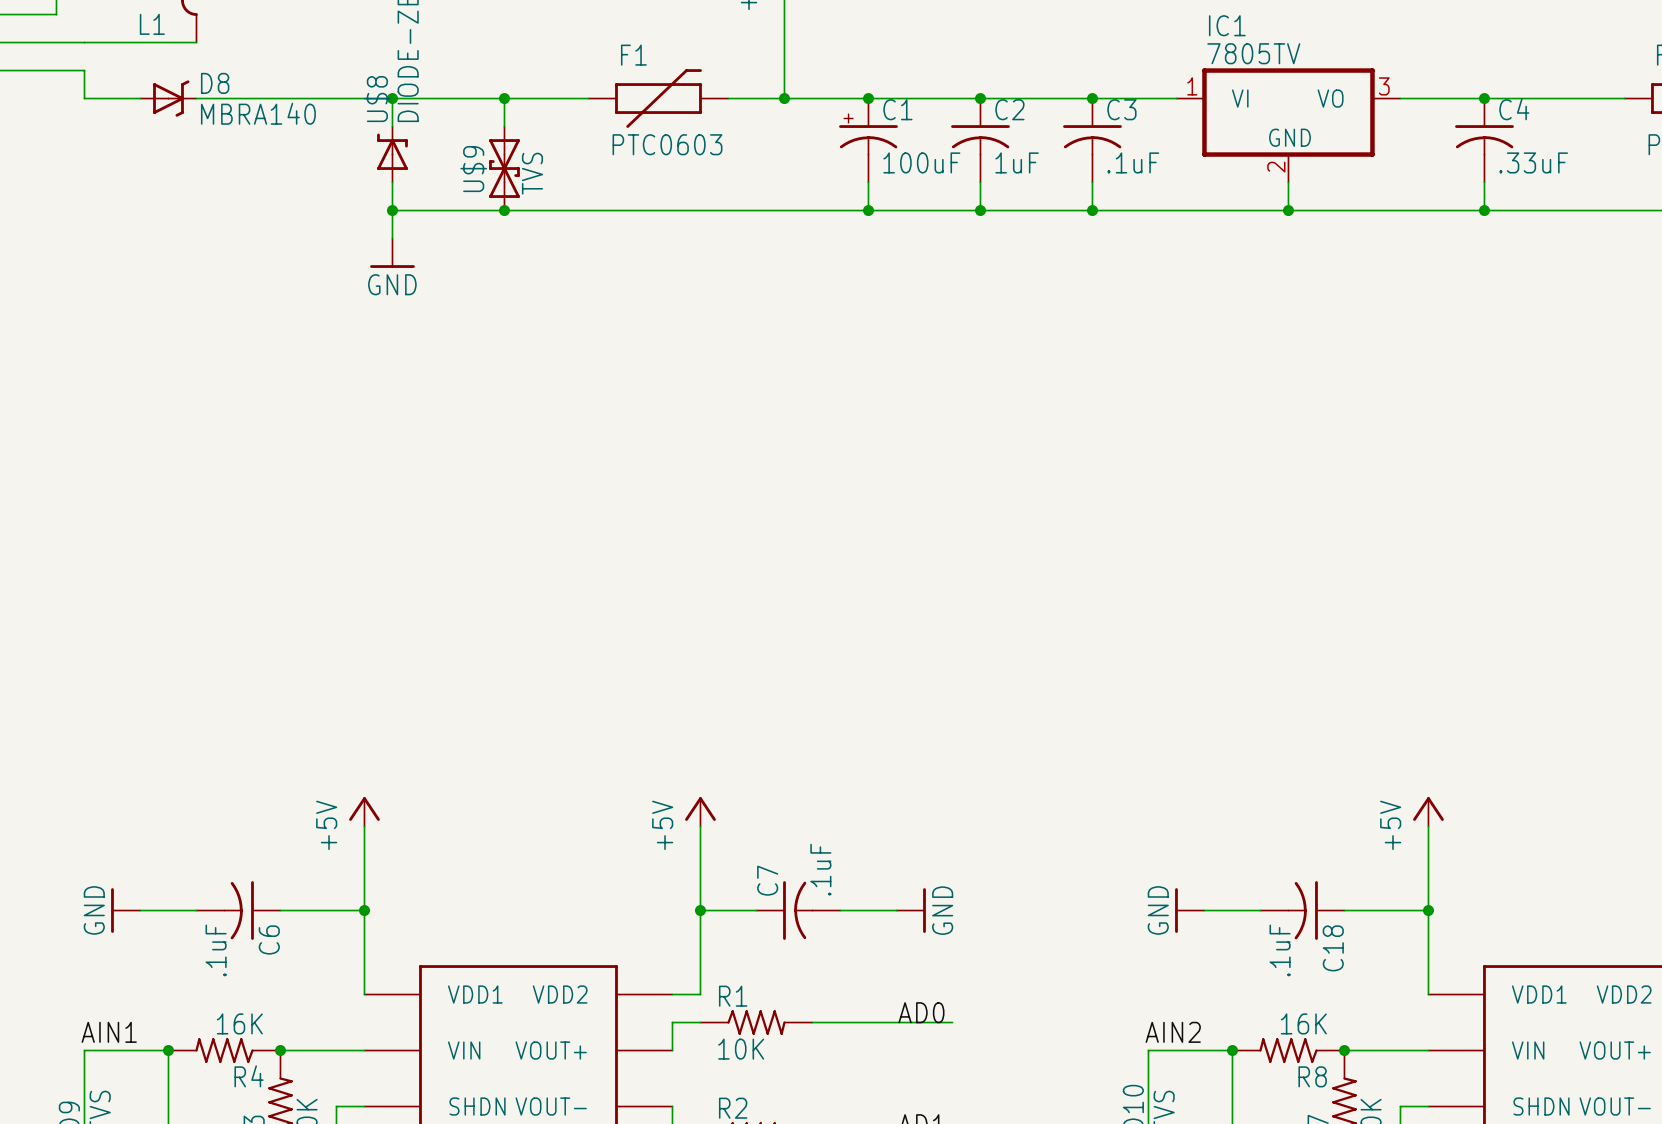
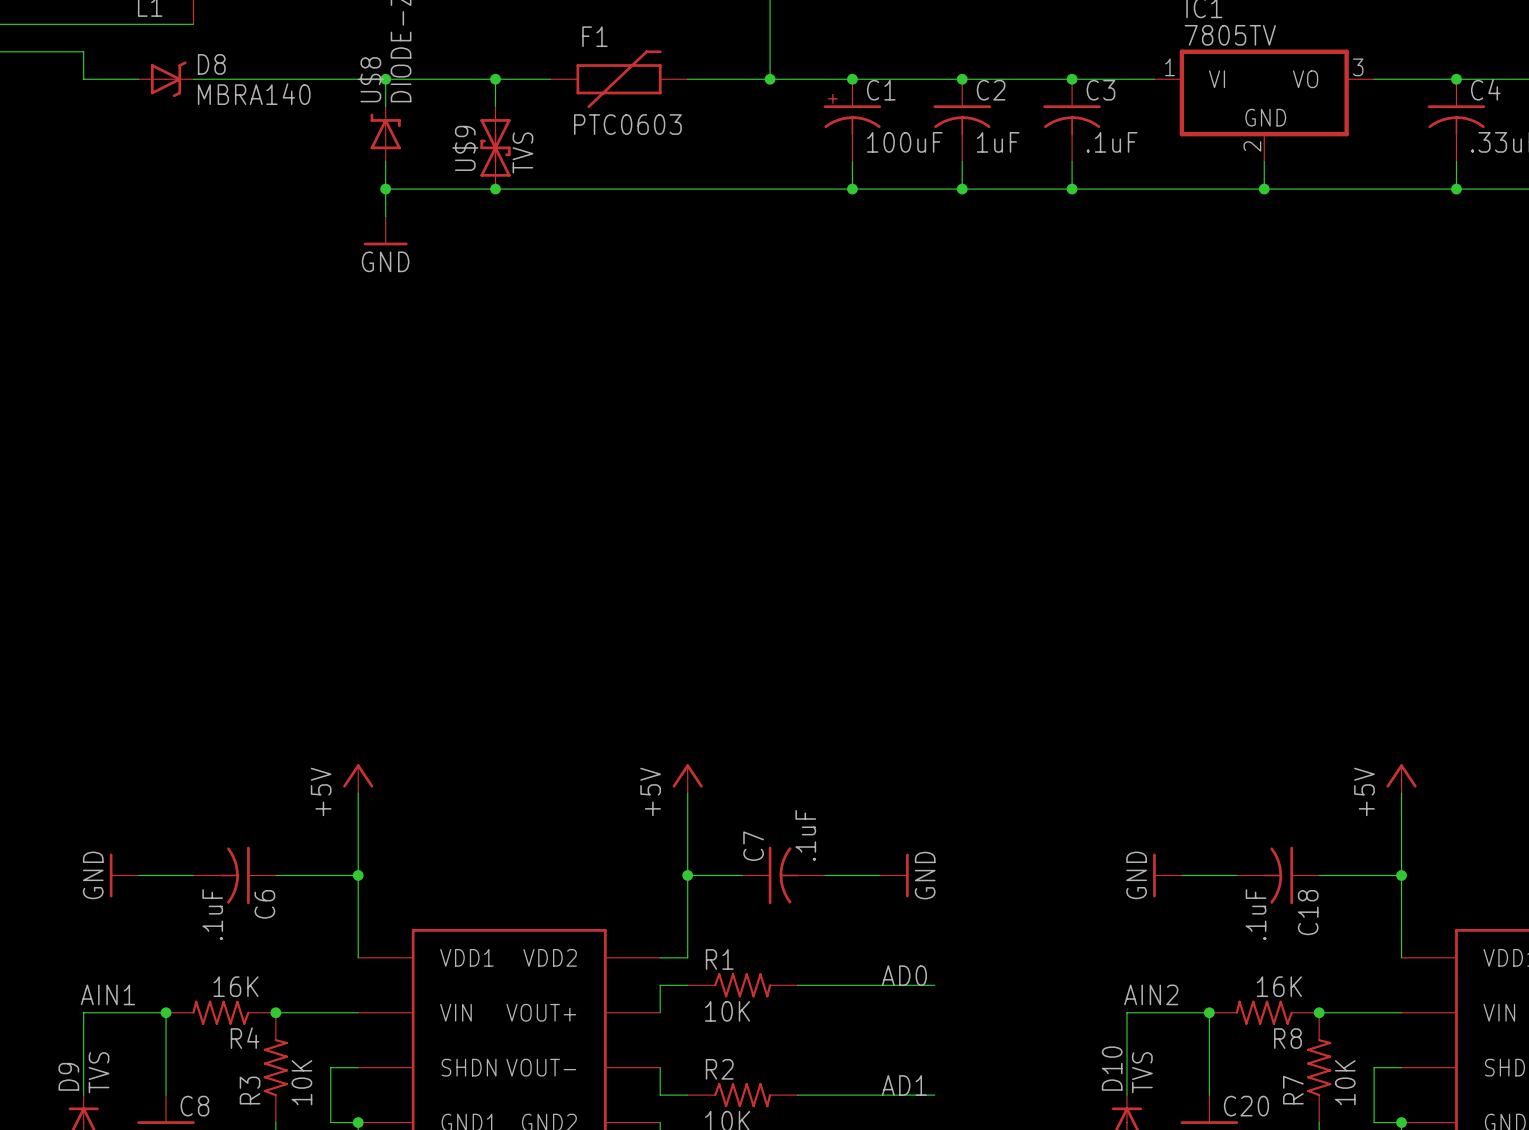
F1 position: (658, 98) -> (619, 79)

